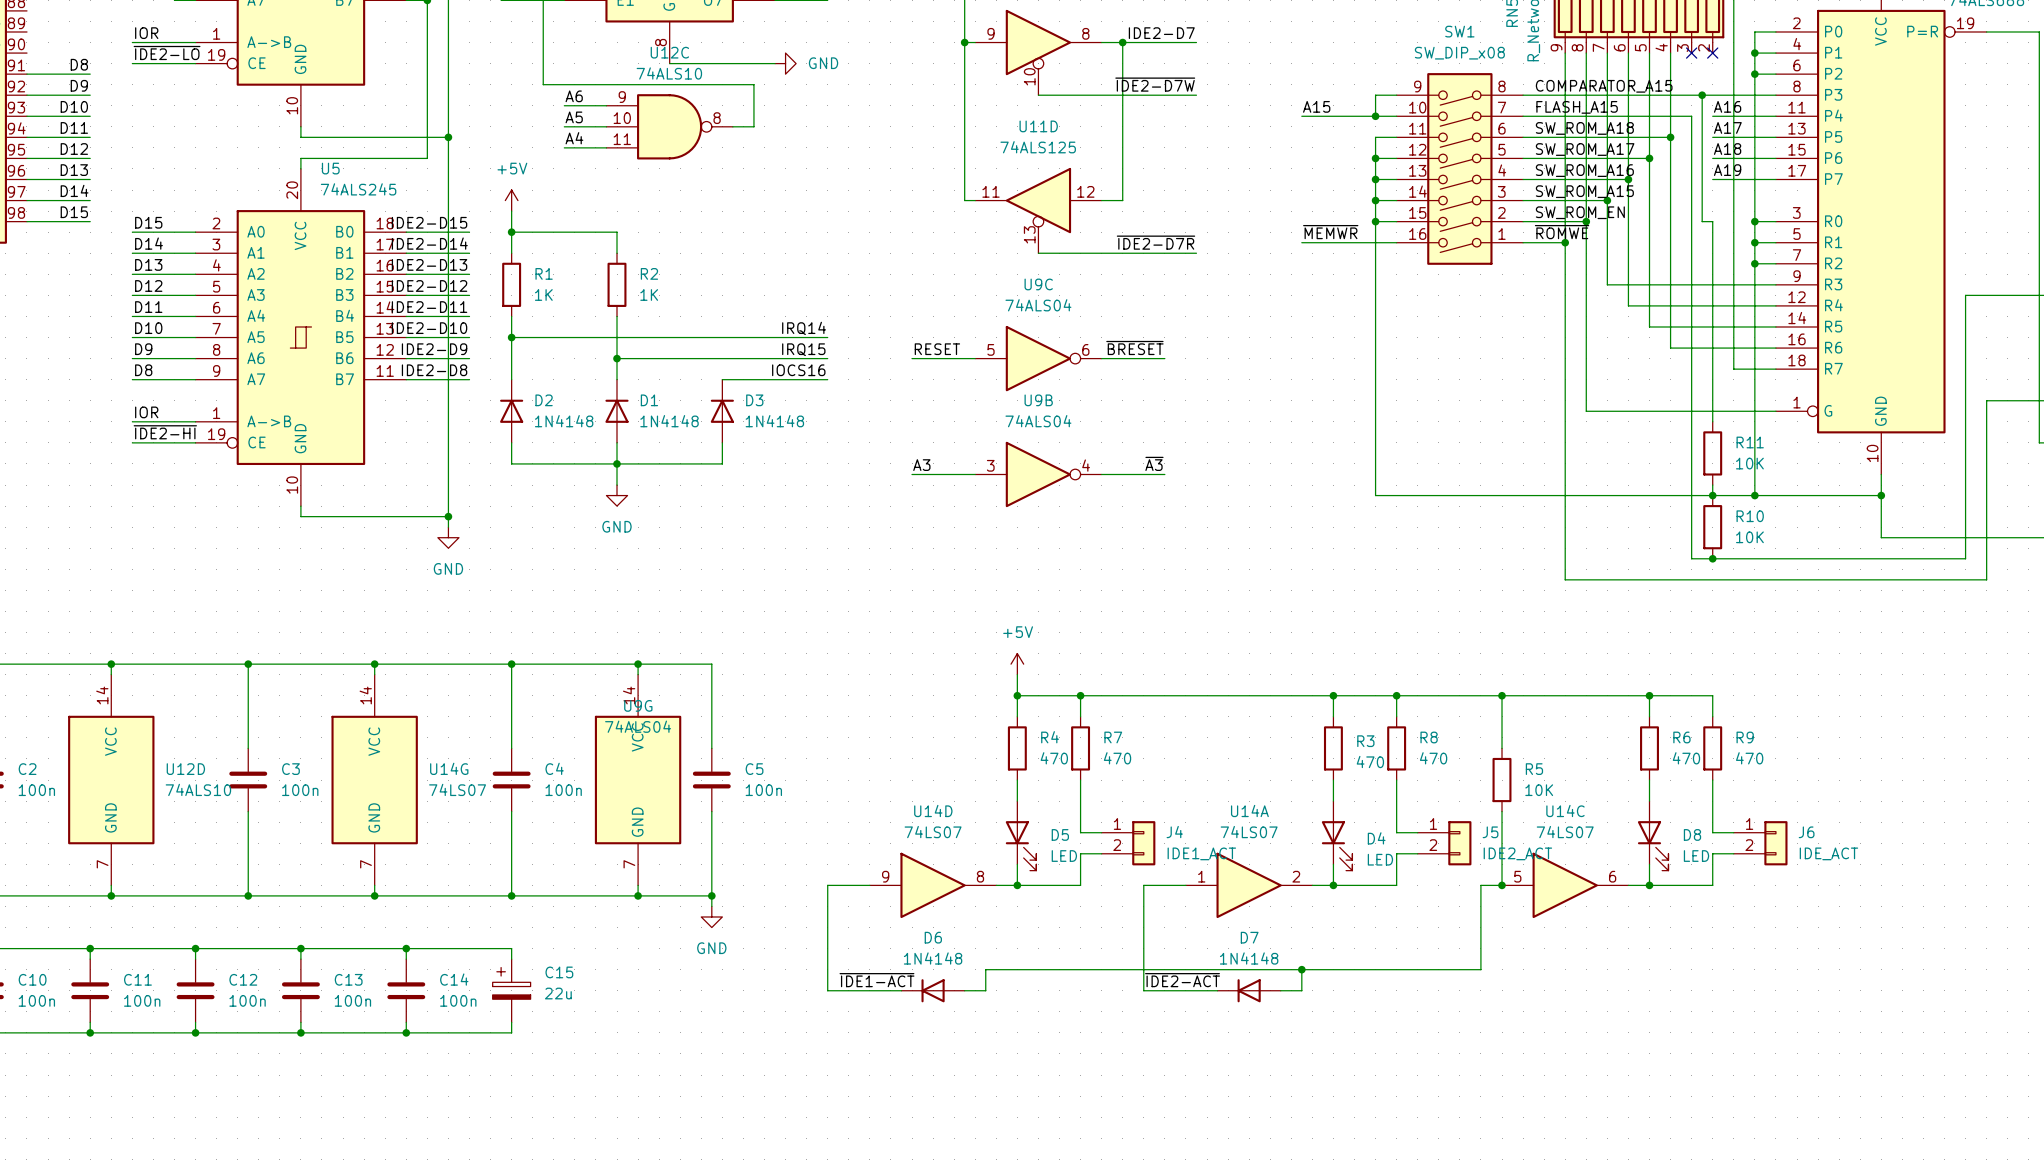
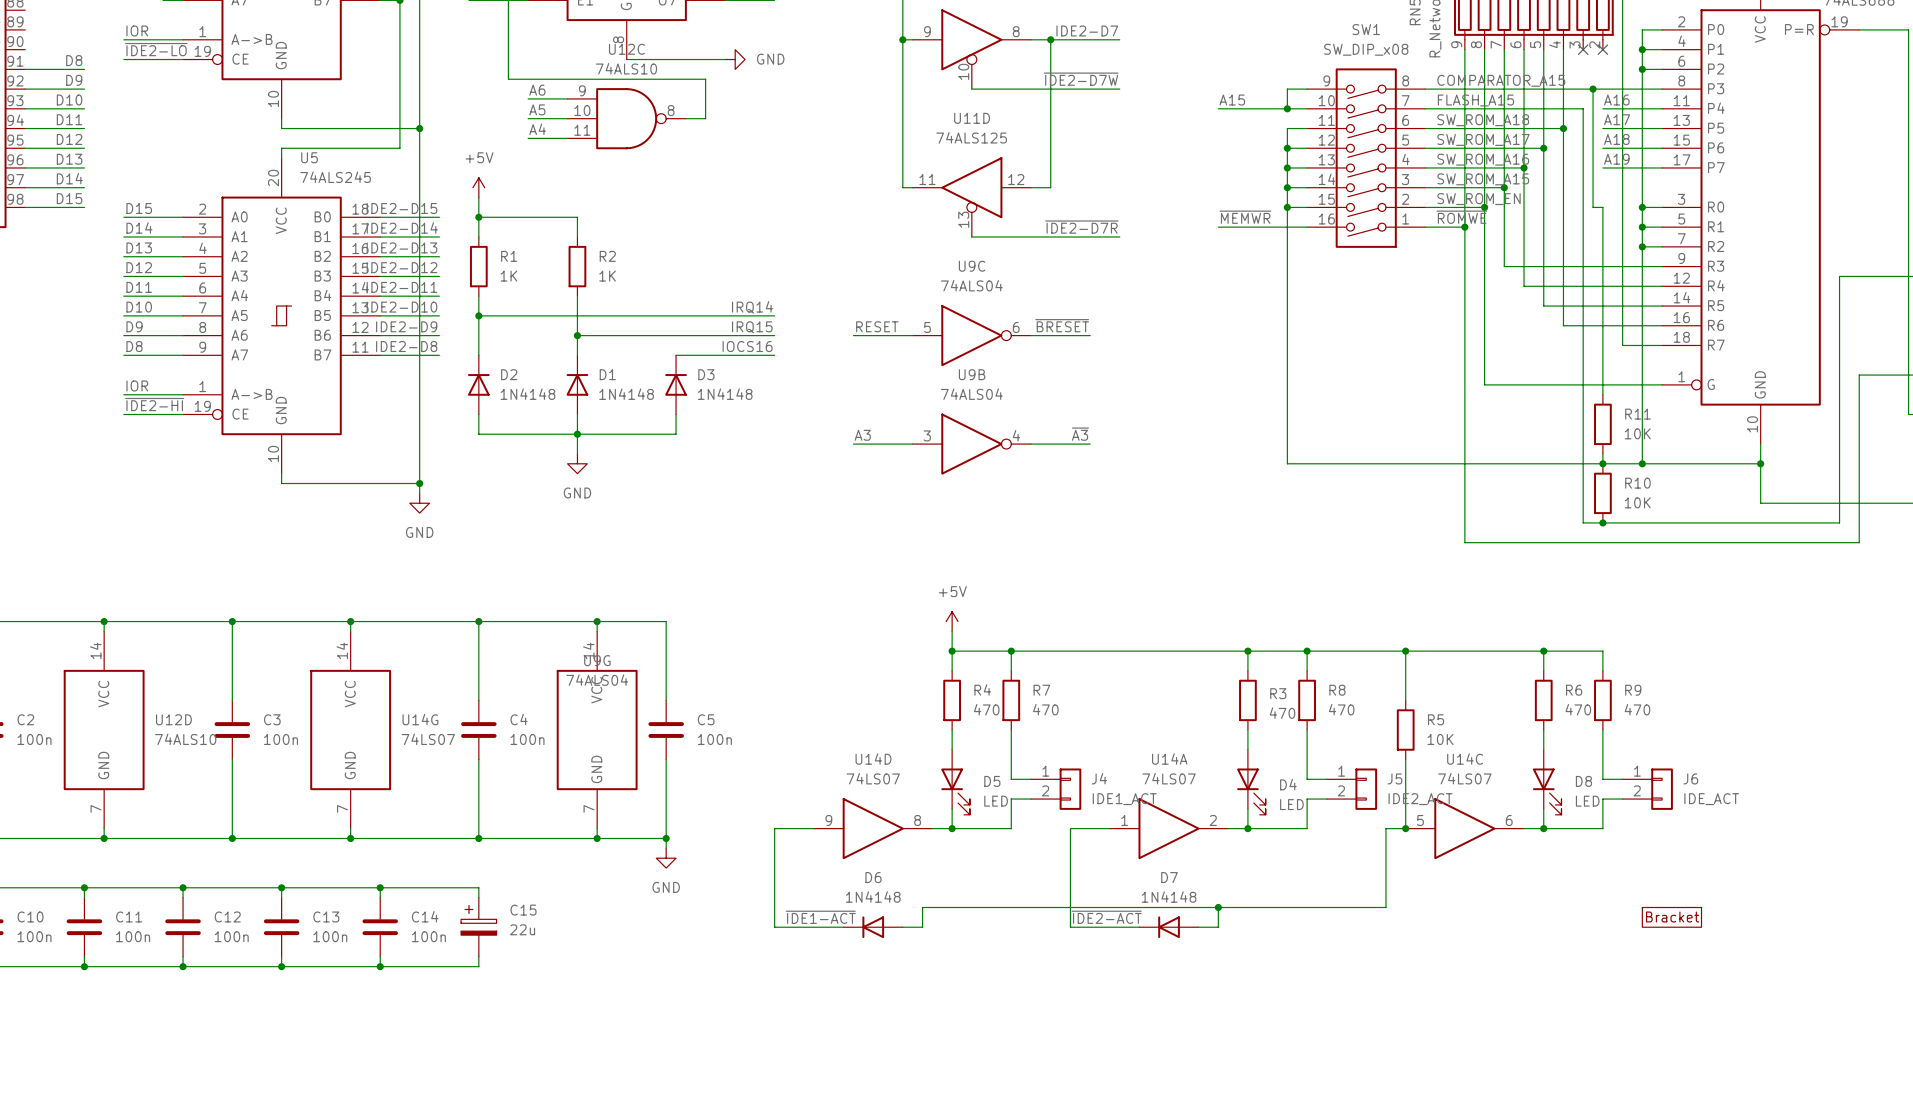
part: none -> (1671, 917)

